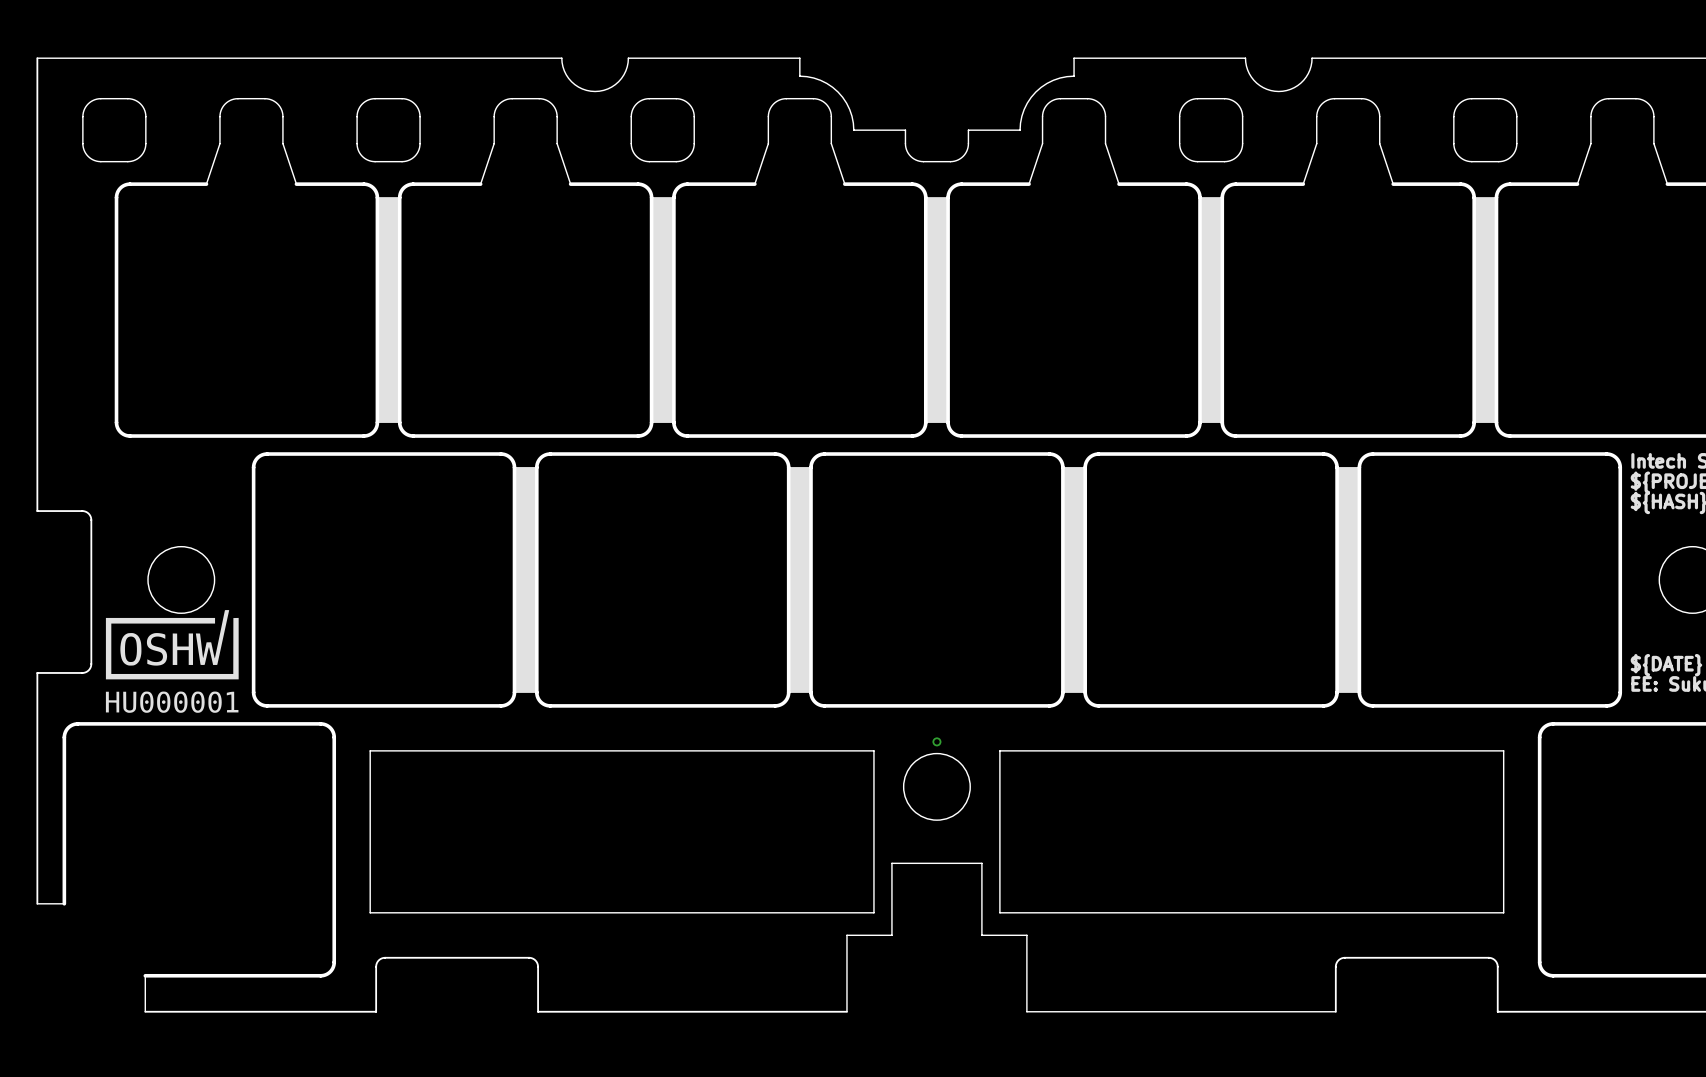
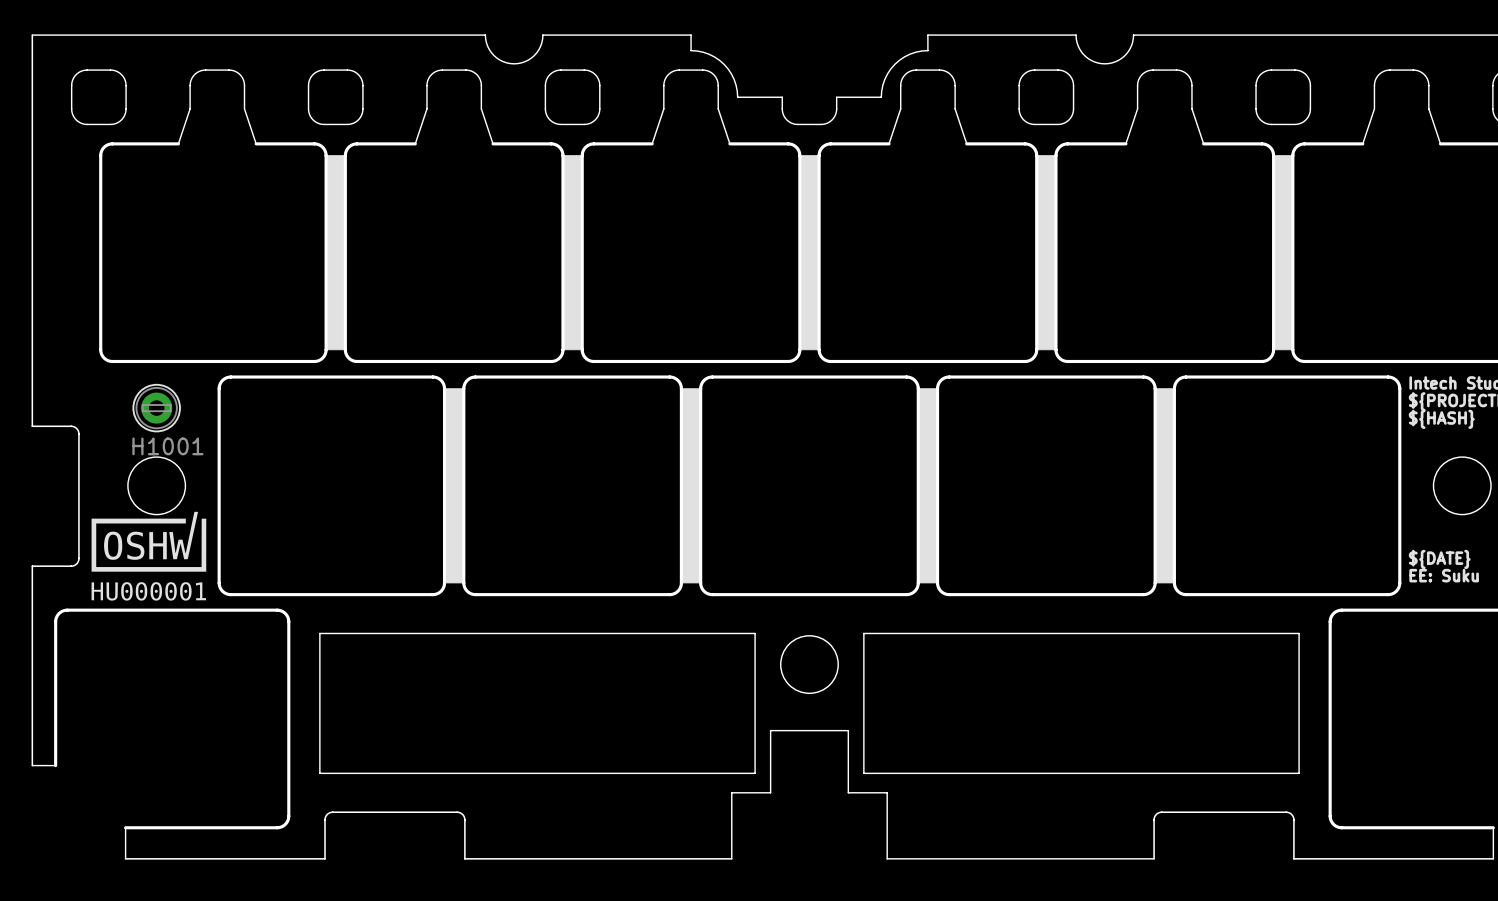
H1001: none -> (156, 408)
via: (936, 741) -> none

